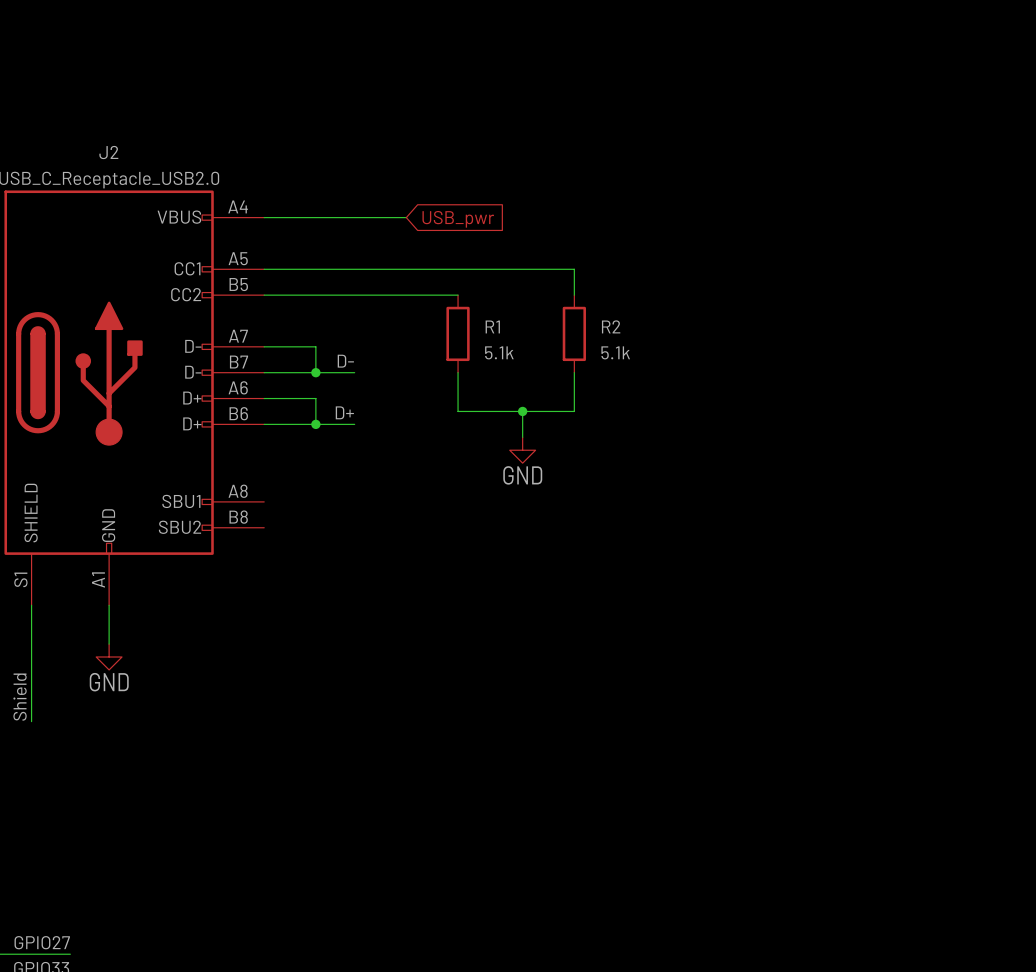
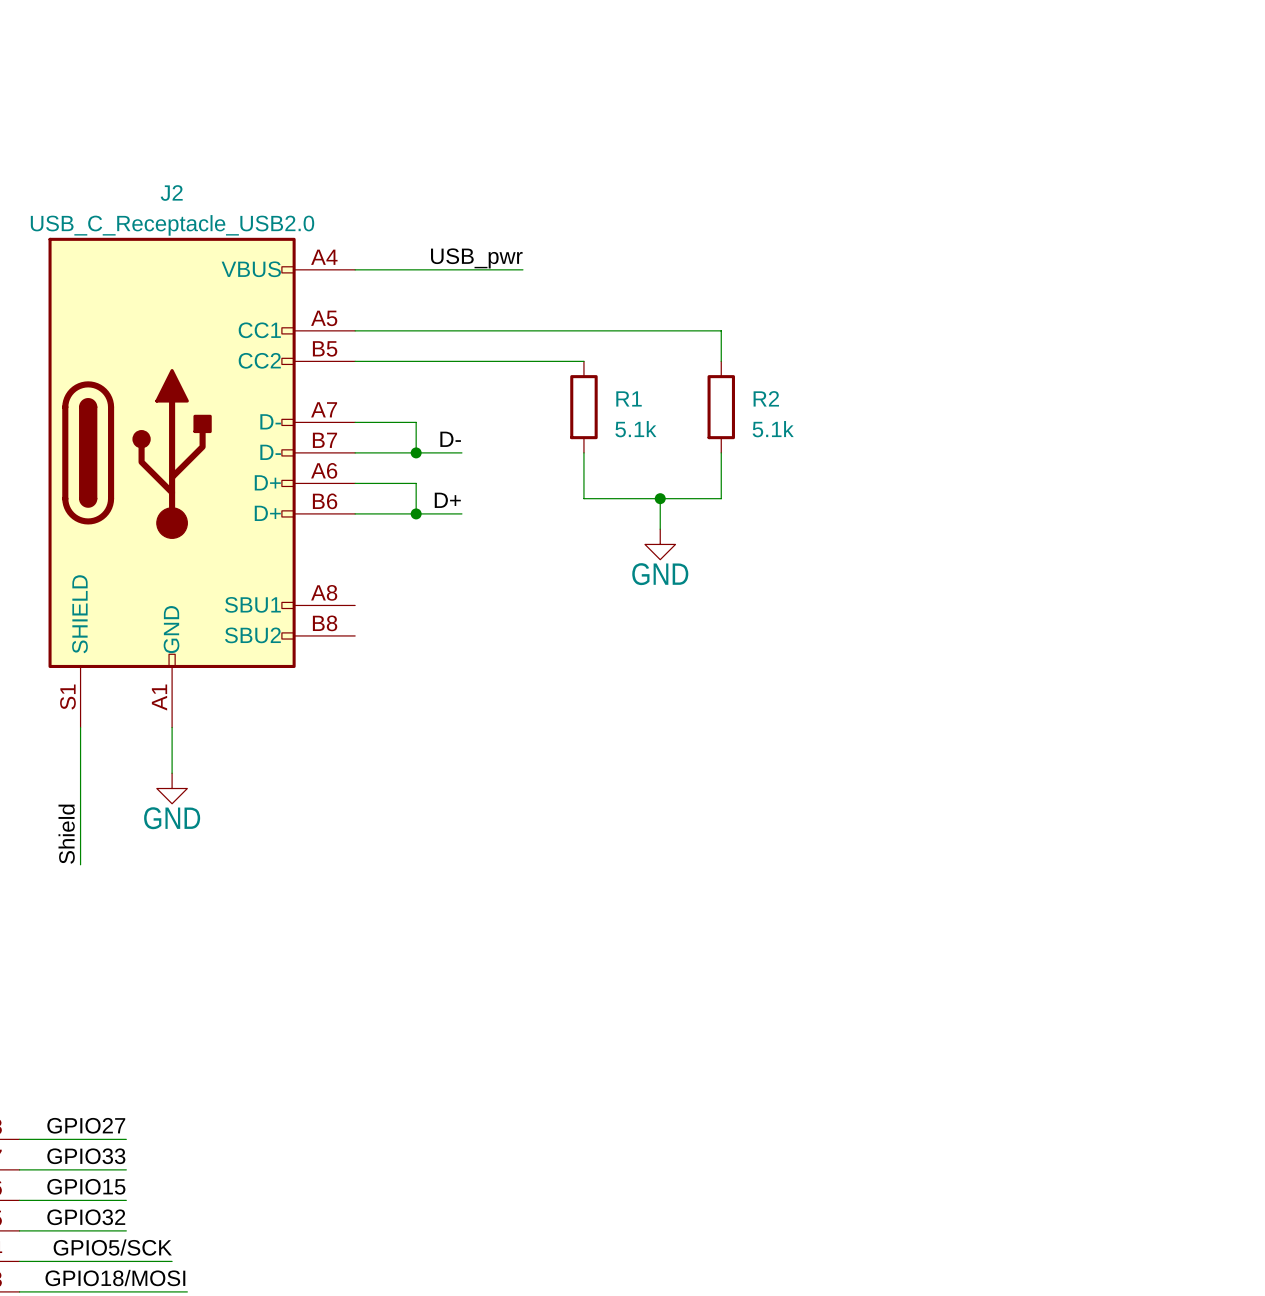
label: none -> USB_pwr (476, 258)
global label: USB_pwr (458, 219) -> none

